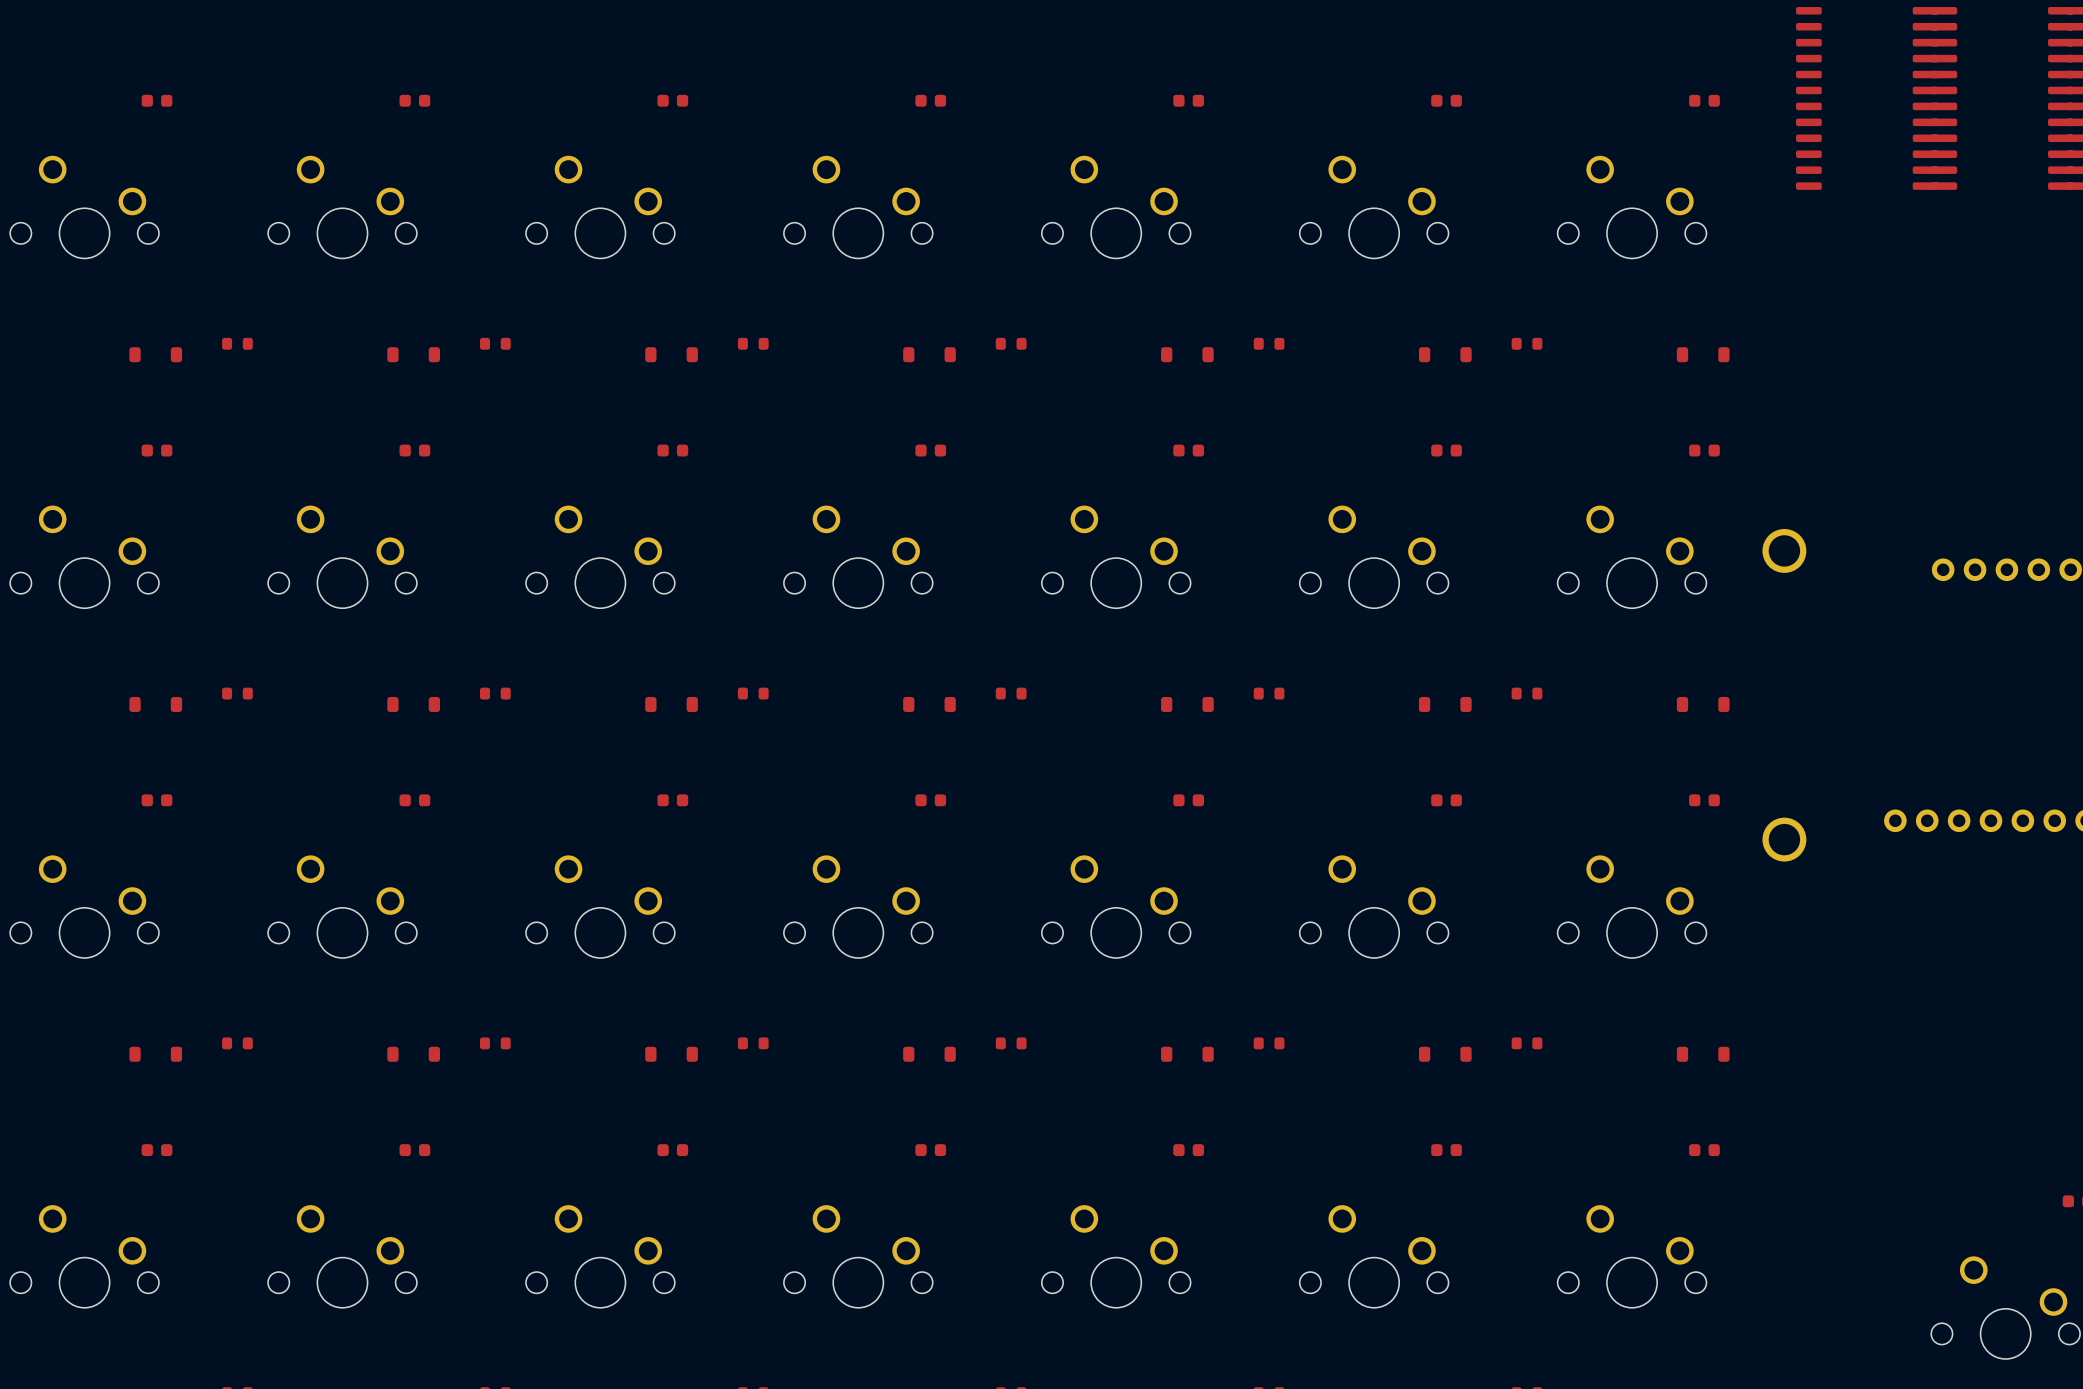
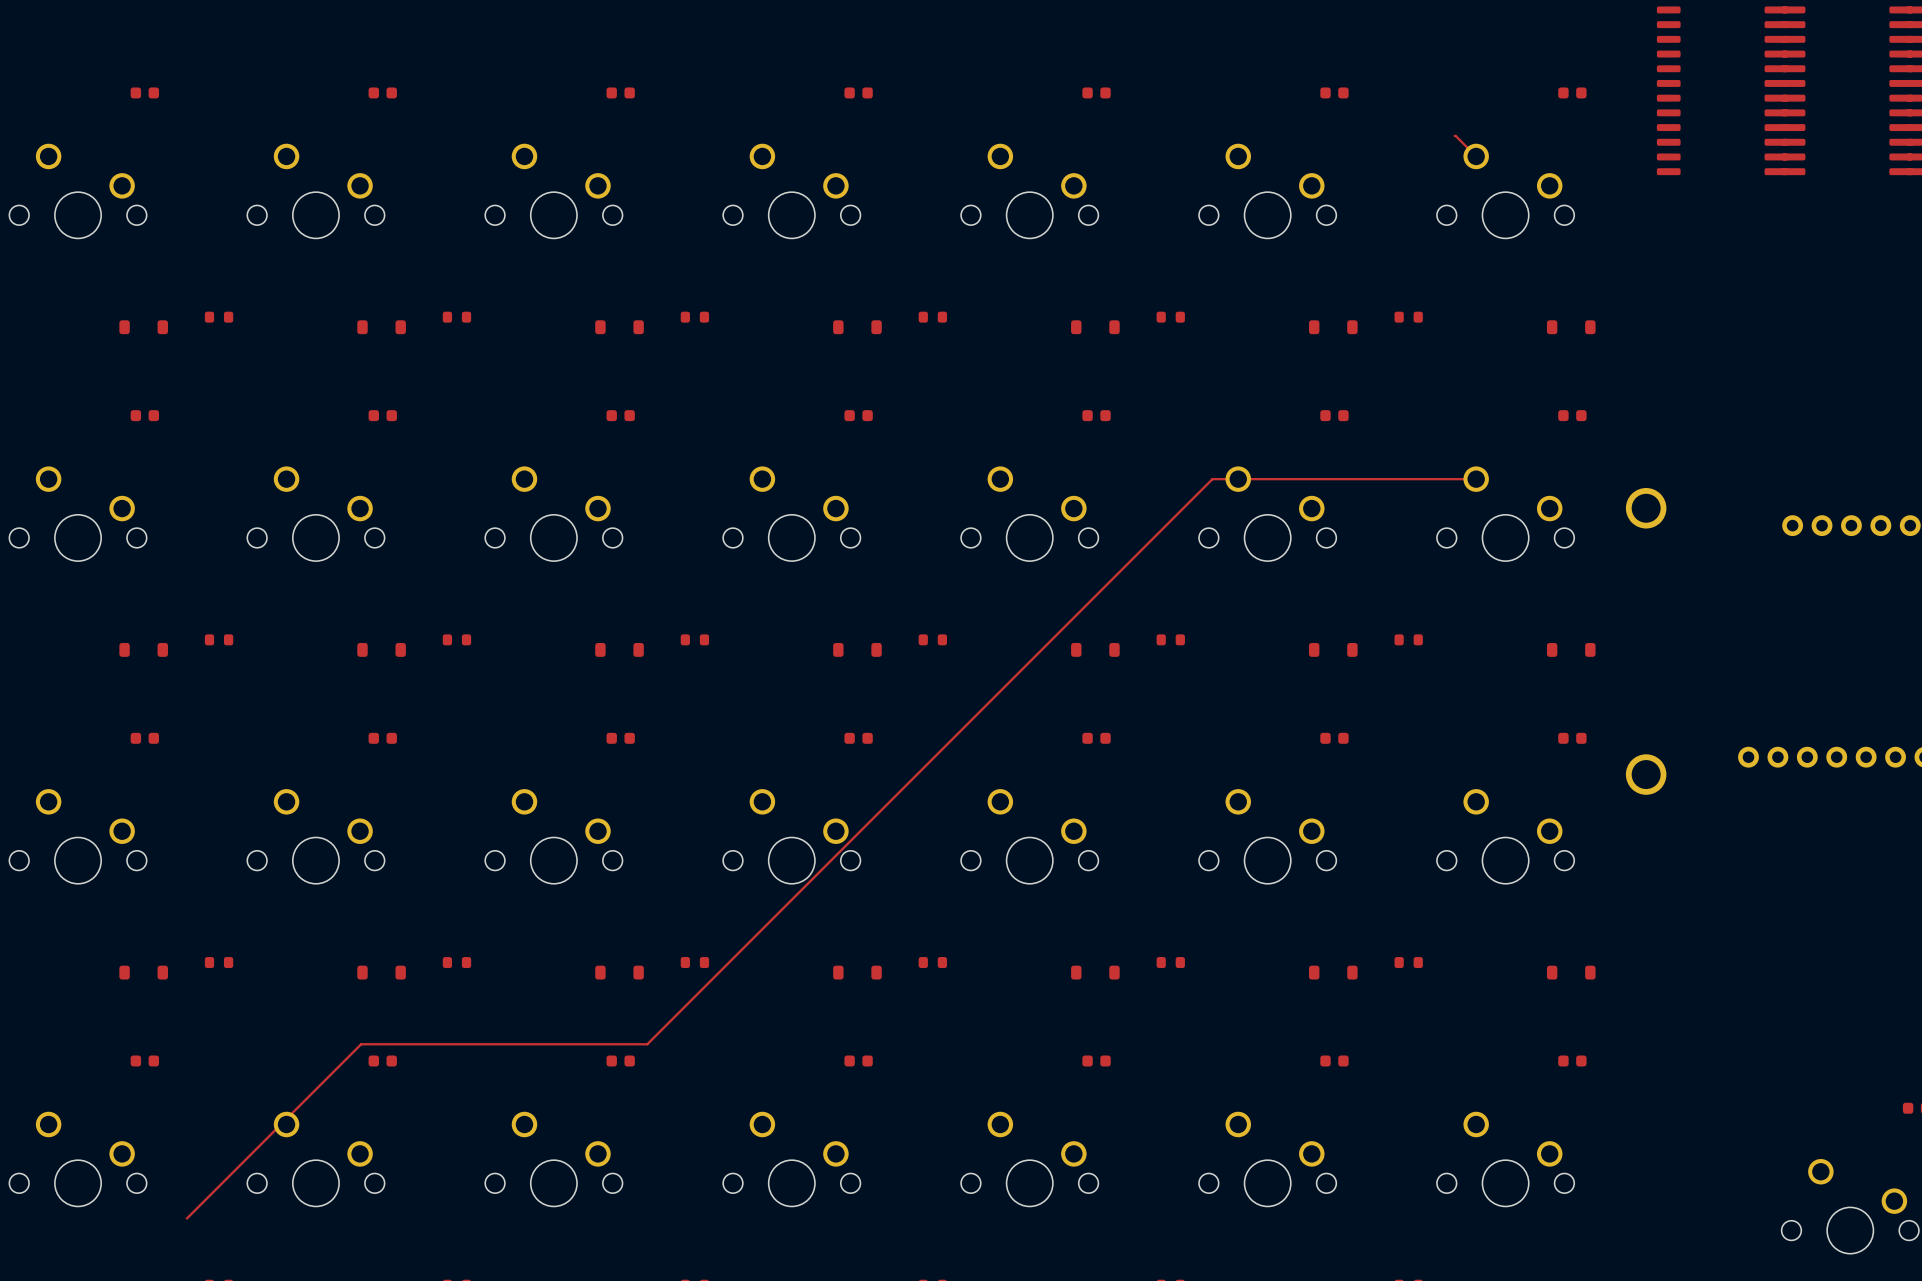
top track: none -> (1454, 135) (1476, 156)
top track: none -> (1476, 479) (1212, 479) (647, 1044) (361, 1044) (186, 1218)

